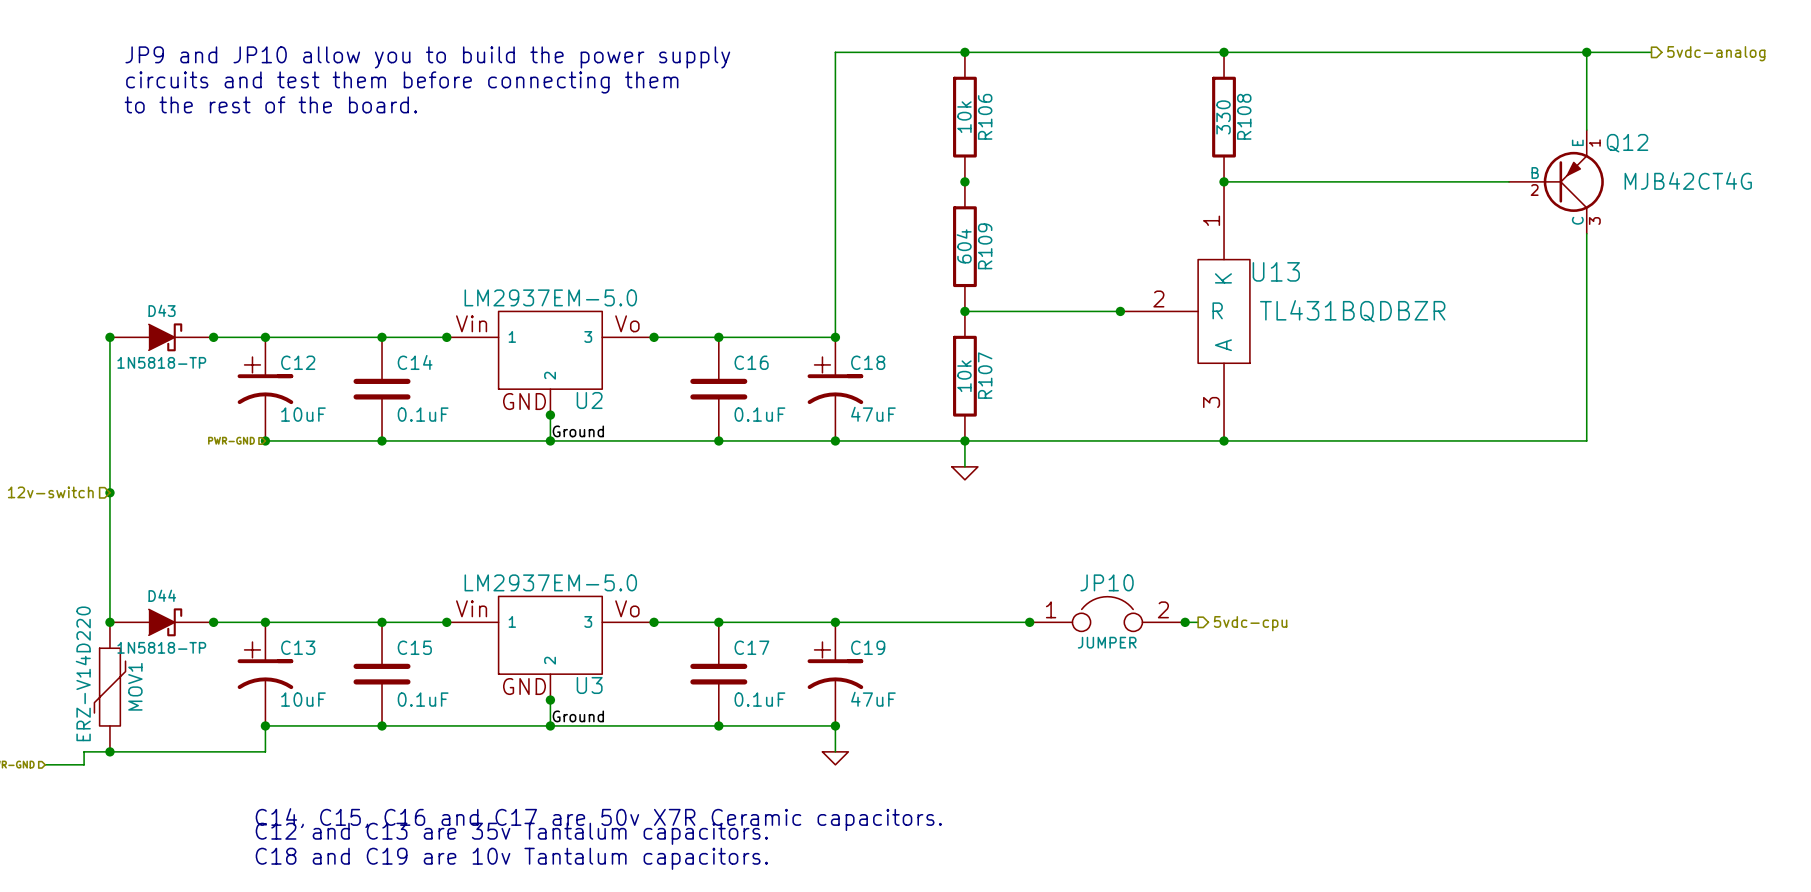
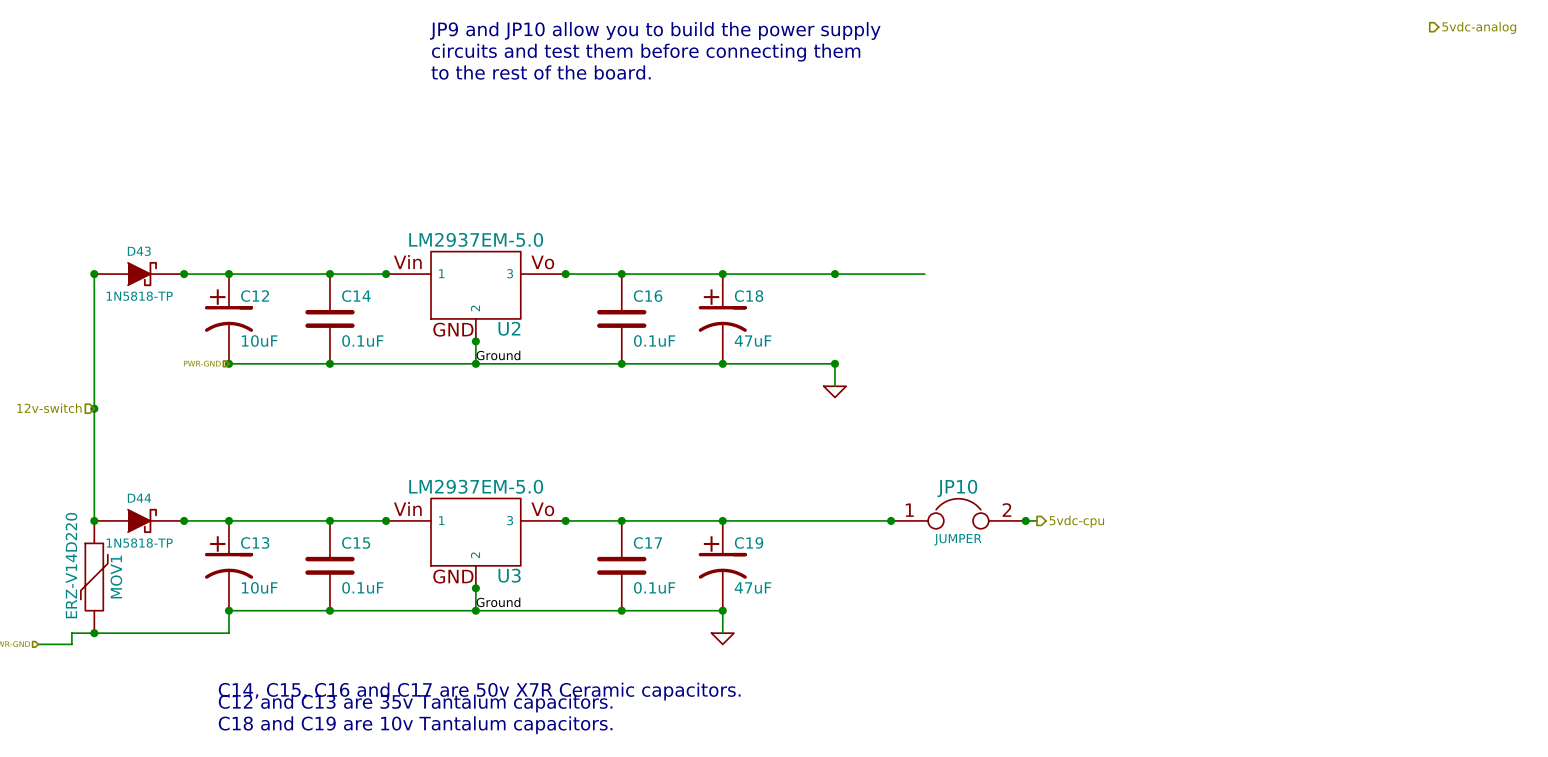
junction: (964, 52) -> none
junction: (1224, 52) -> none
wire: (1586, 52) (1586, 130) -> none
junction: (1586, 52) -> none
wire: (1651, 52) (835, 52) (835, 337) -> (924, 274) (722, 274)
text: JP9 and JP10 allow you to build the power supply (427, 57) -> none
text: none -> JP9 and JP10 allow you to build the power supply (655, 30)
text: circuits and test them before connecting them (402, 82) -> none
text: none -> circuits and test them before connecting them (646, 52)
text: to the rest of the board. (270, 104) -> none
text: none -> to the rest of the board. (541, 72)
R106: 10k (964, 117) -> none
R108: 330 (1224, 117) -> none
junction: (964, 181) -> none
wire: (1224, 181) (1509, 181) -> none
junction: (1224, 181) -> none
Q12: MJB42CT4G (1556, 181) -> none
wire: (1586, 233) (1586, 440) (964, 440) -> none
R109: 604 (964, 246) -> none
wire: (964, 311) (1120, 311) -> none
junction position: (964, 311) -> (834, 274)
junction: (1120, 311) -> none
U13: TL431BQDBZR (1185, 311) -> none
R107: 10k (964, 376) -> none
junction: (1224, 440) -> none

